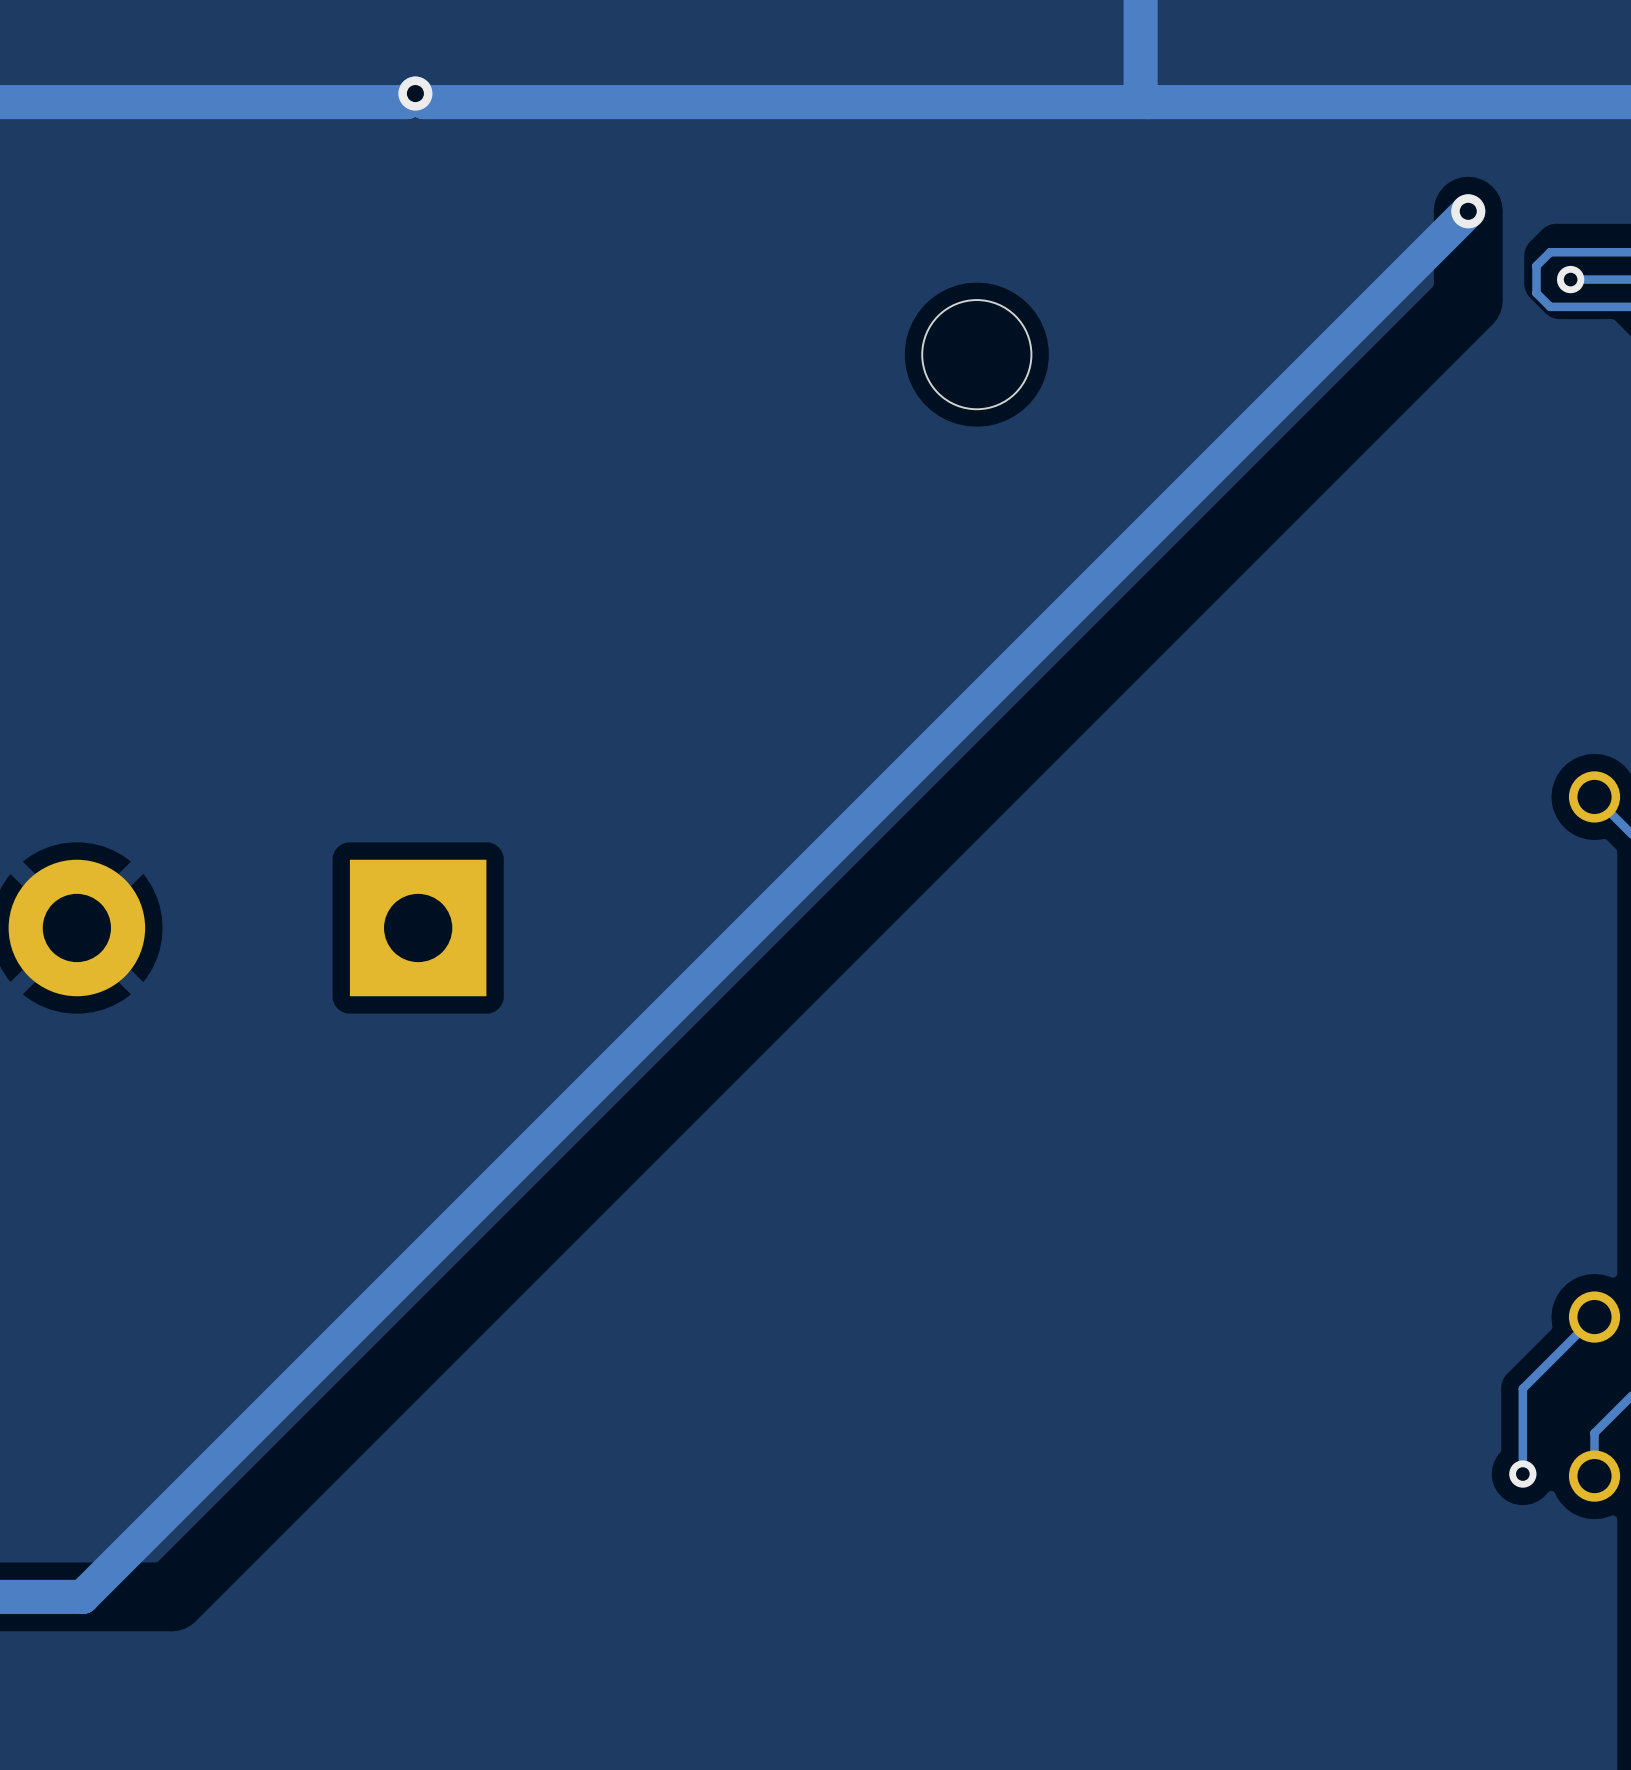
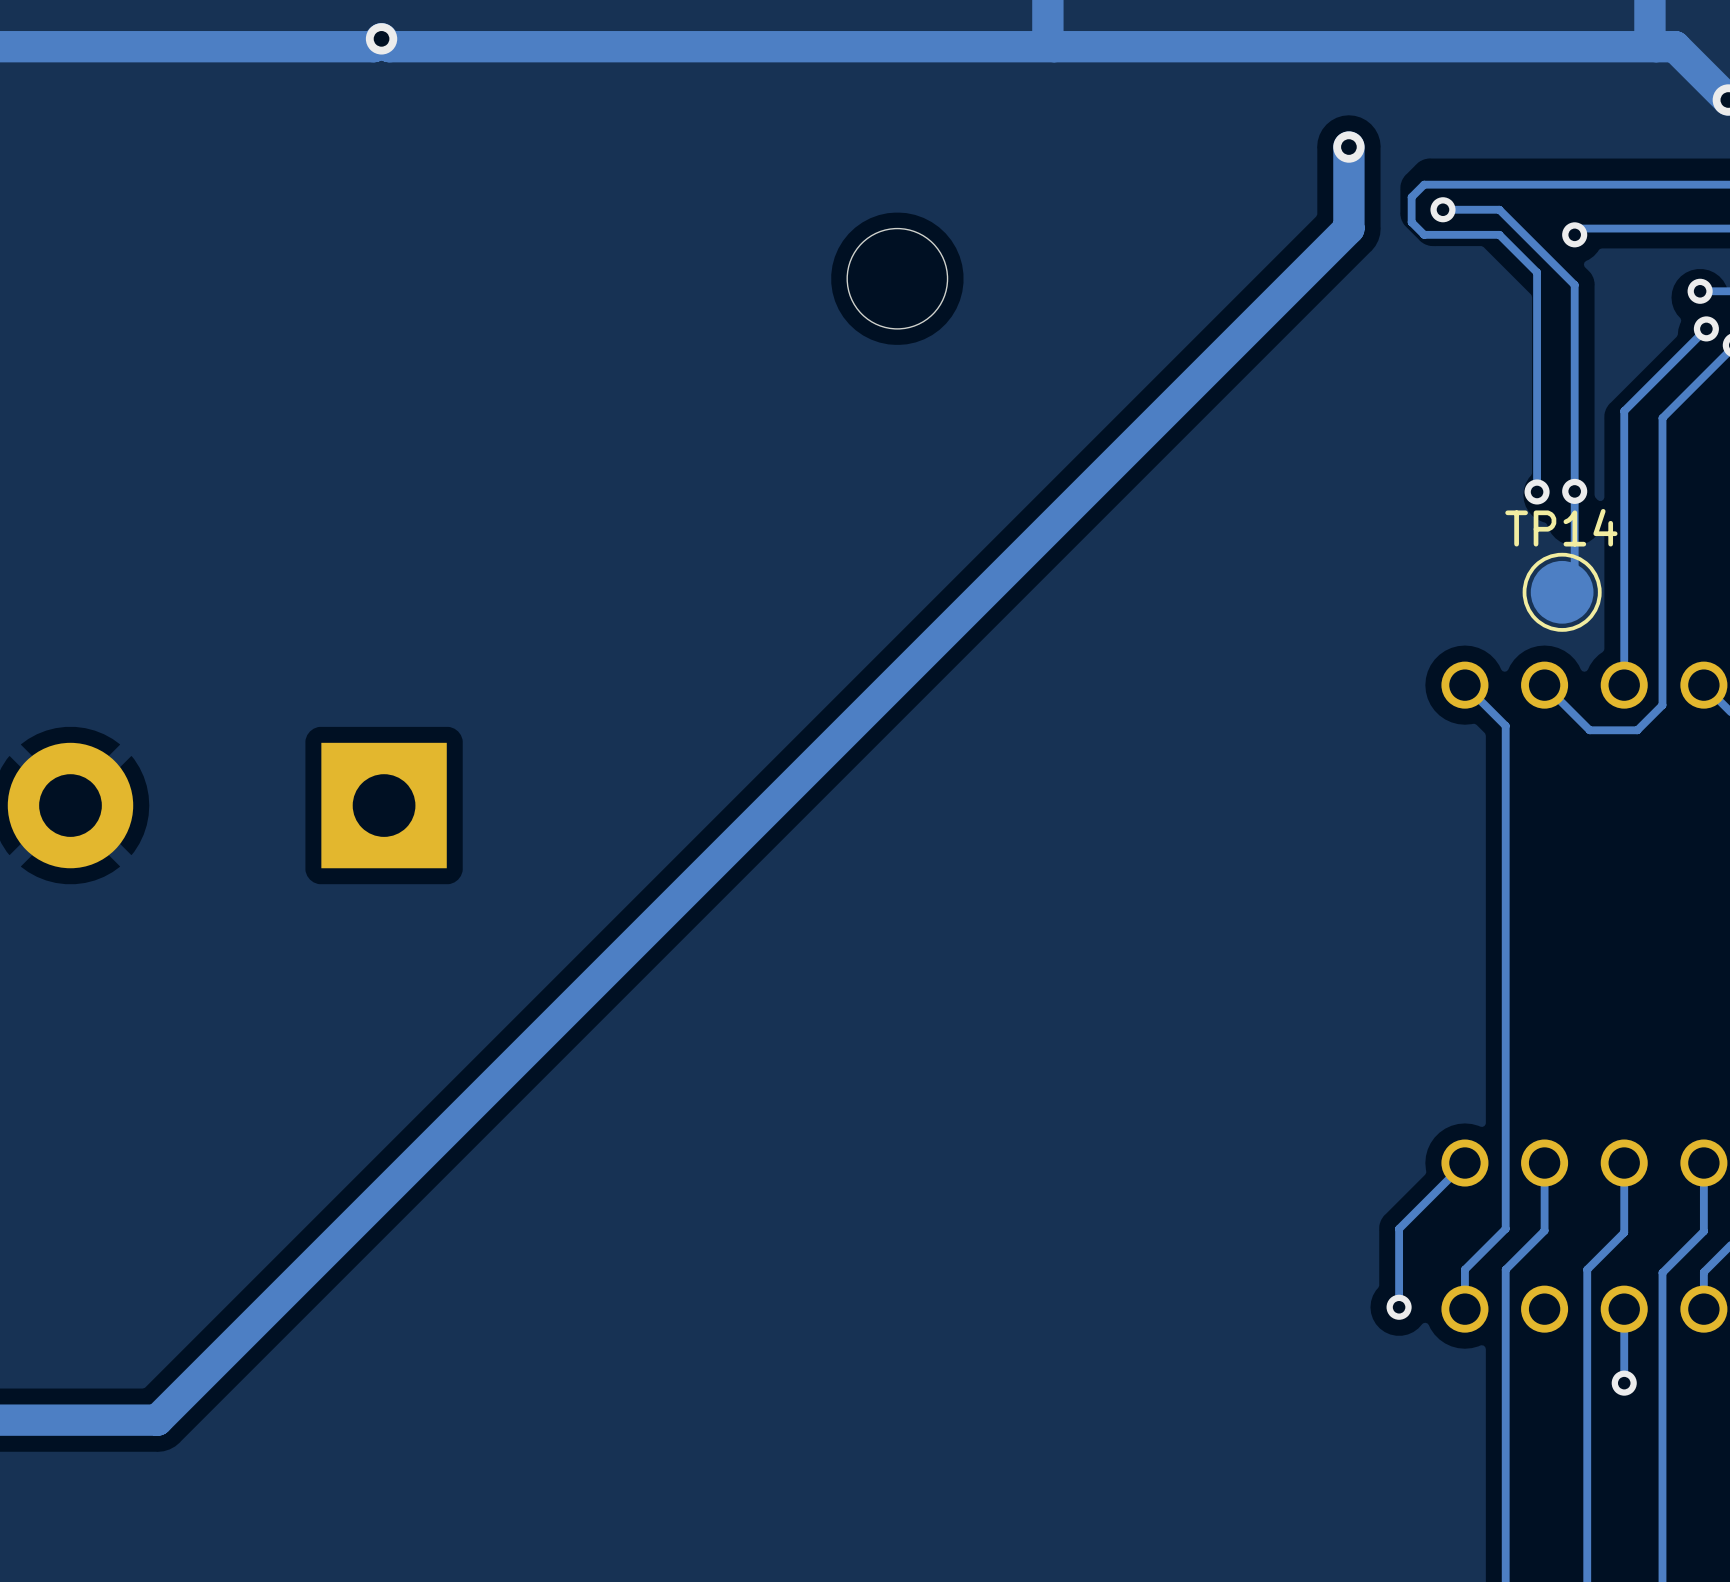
track: (1468, 211) (82, 1596) -> (1348, 147) (1348, 228) (157, 1420) (75, 1420)

